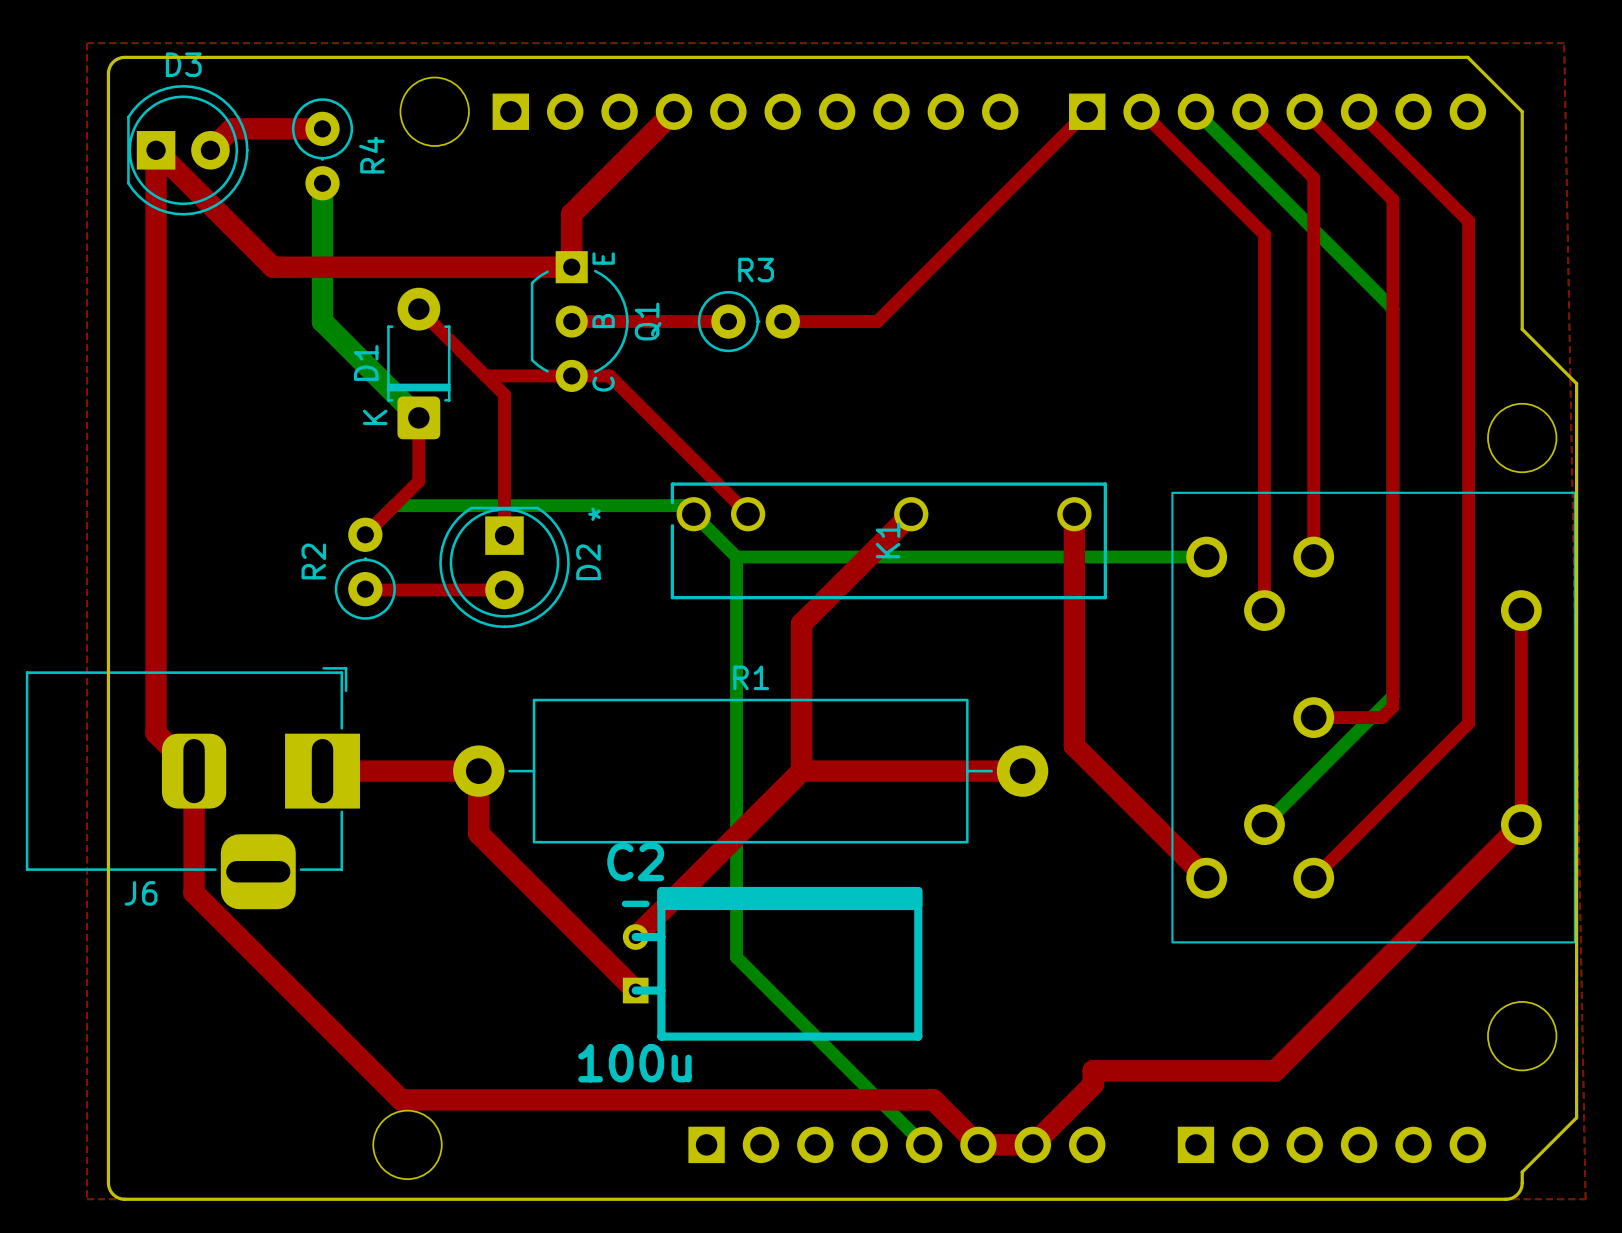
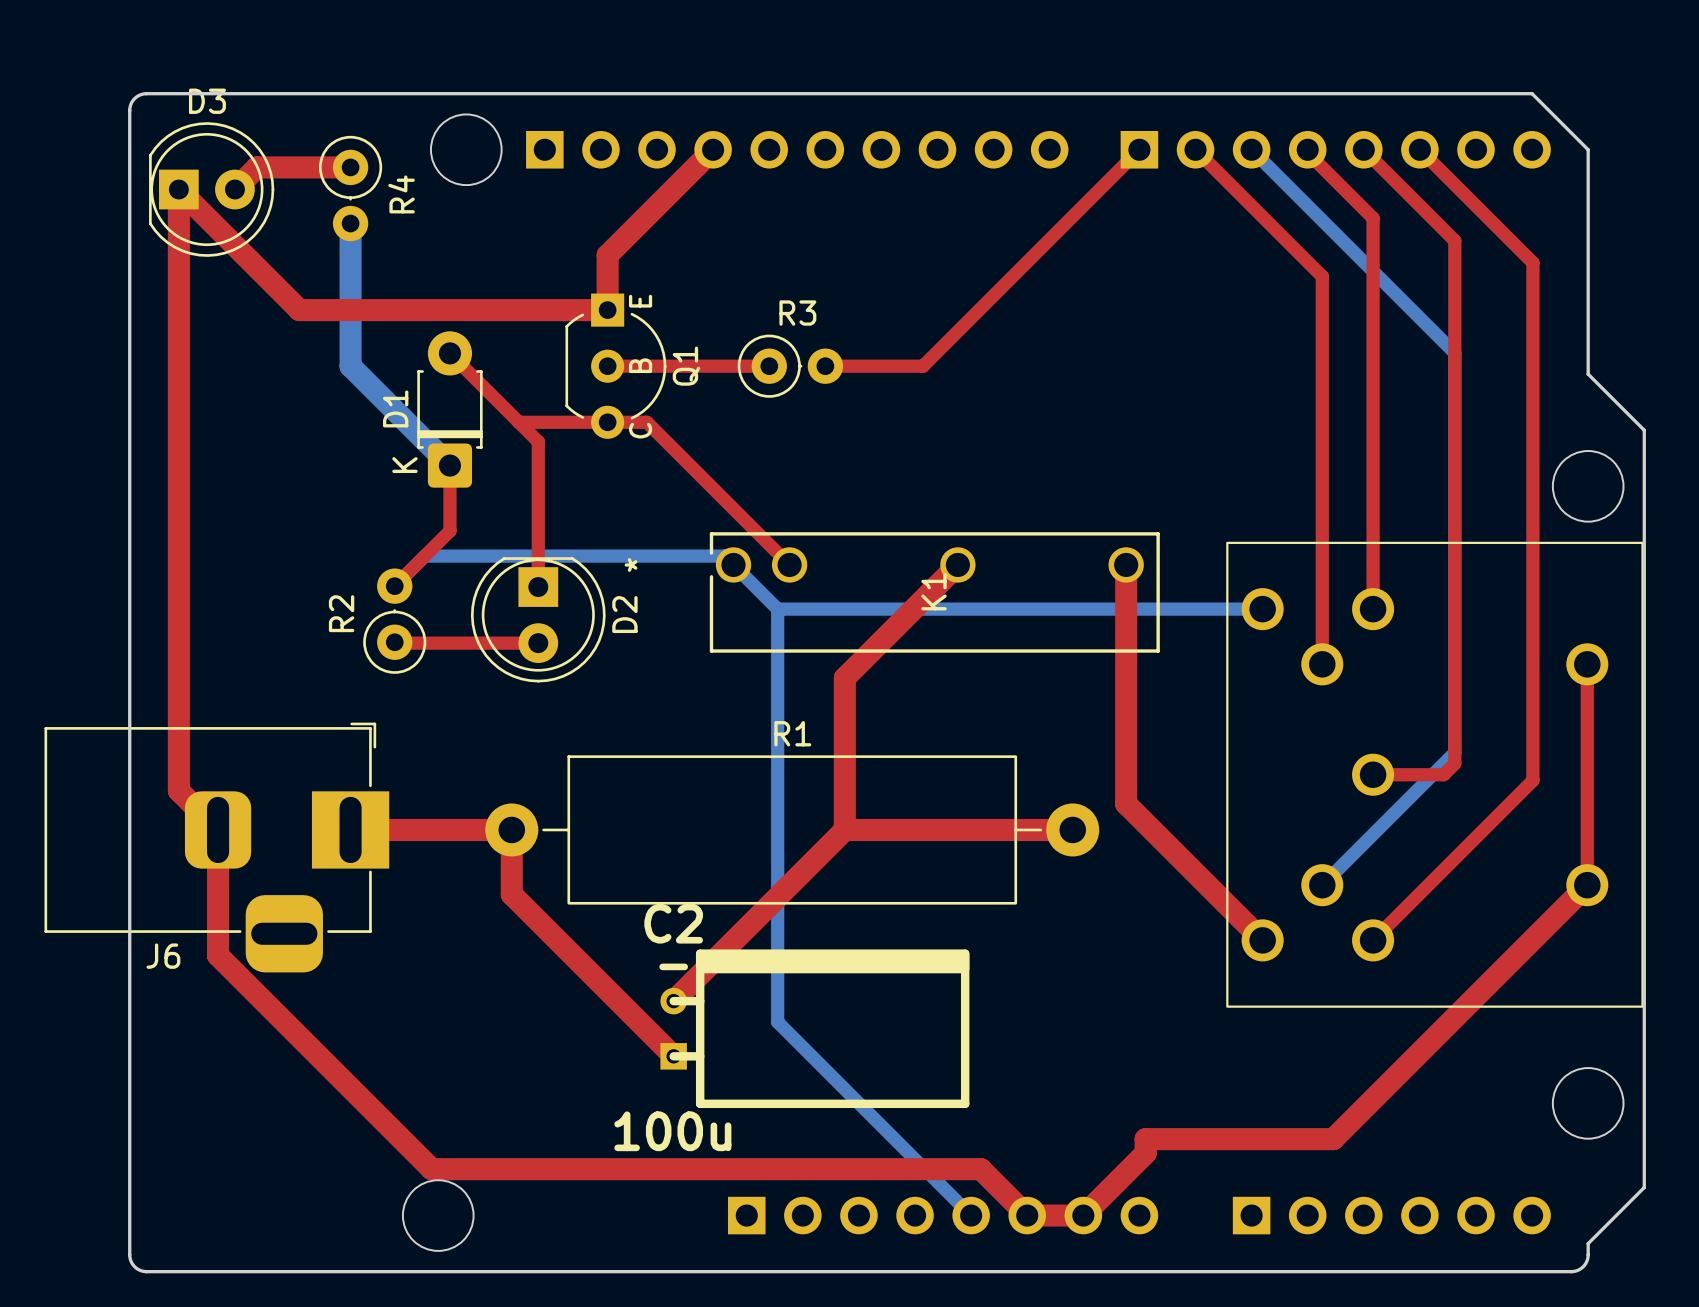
top zone outline: (87, 43) (87, 1199) (1585, 1199) (1564, 43) (87, 43) -> none

